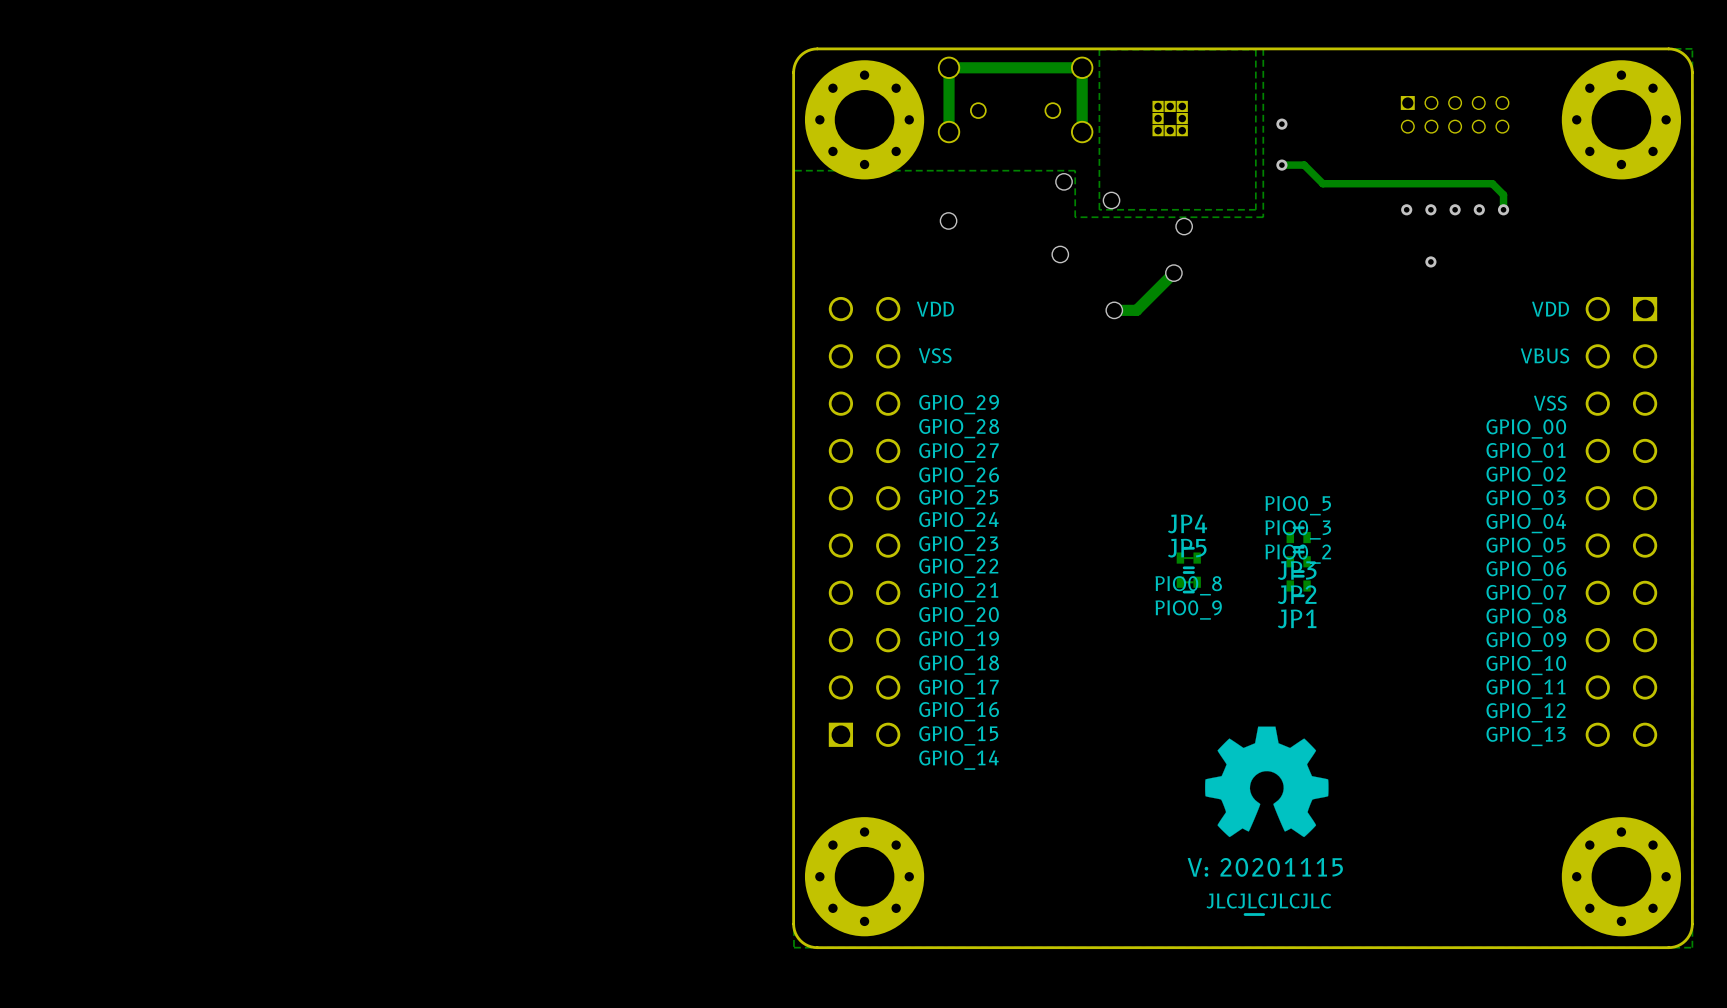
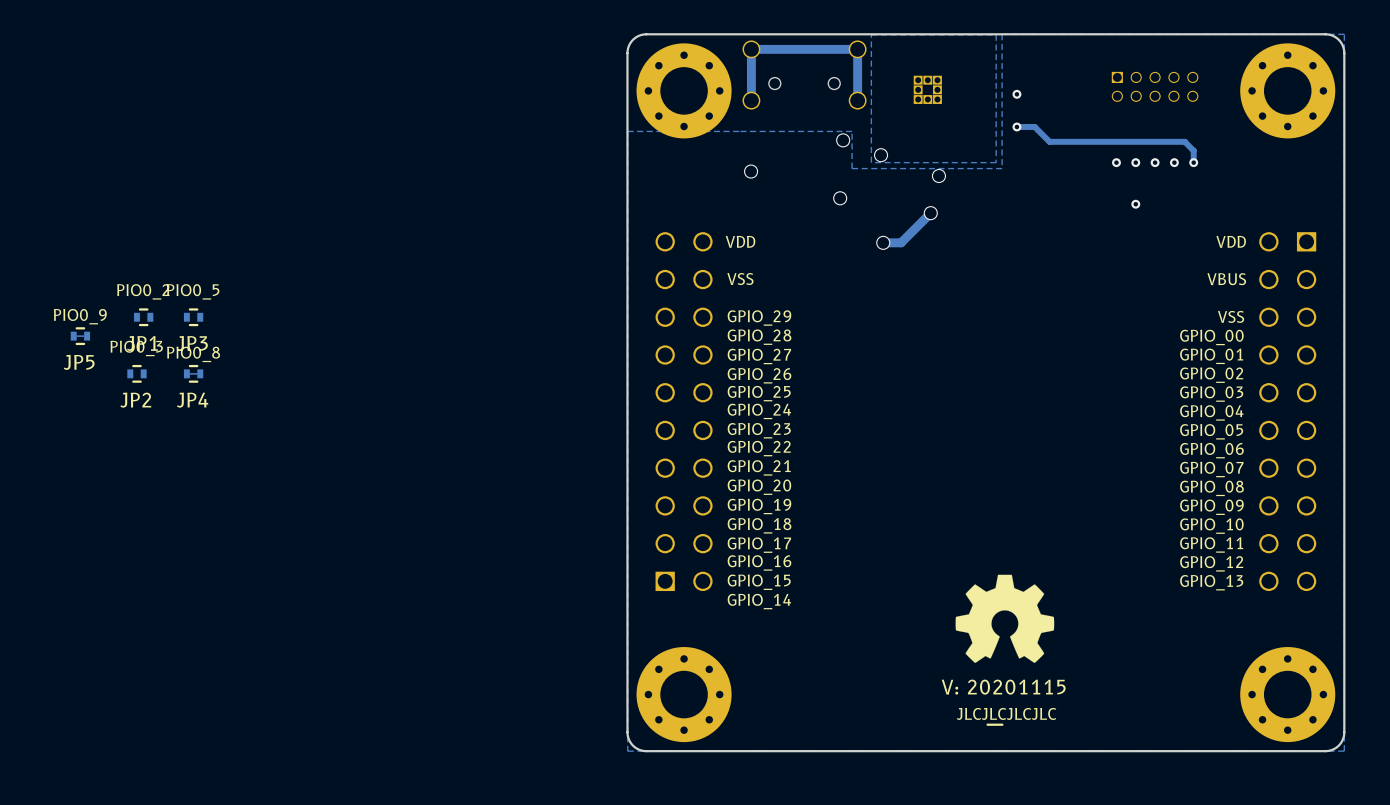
JP4 name position: JP4 (1187, 523) -> JP4 (192, 400)
JP3 position: (1298, 537) -> (193, 317)
JP5 name position: JP5 (1187, 548) -> JP5 (79, 362)
JP4 position: (1188, 558) -> (193, 373)
JP2 position: (1298, 561) -> (136, 373)
JP5 position: (1188, 582) -> (80, 336)
JP4 value position: PIO0_8 (1188, 585) -> PIO0_8 (193, 354)
JP1 position: (1298, 585) -> (143, 317)
JP5 value position: PIO0_9 (1188, 610) -> PIO0_9 (80, 316)

